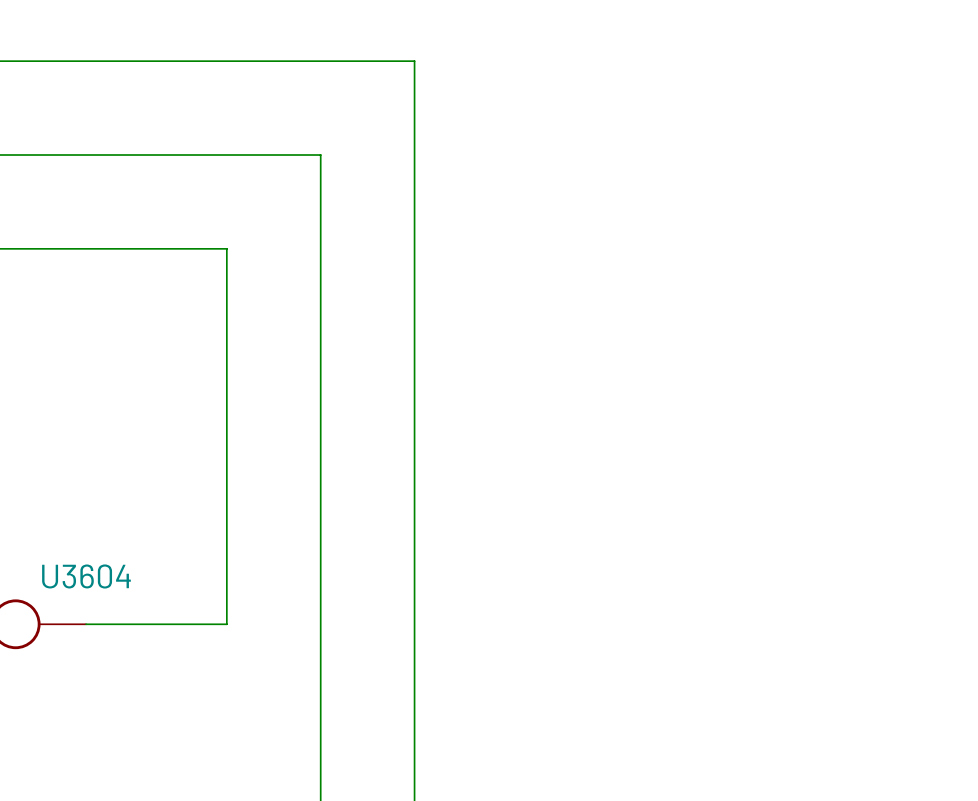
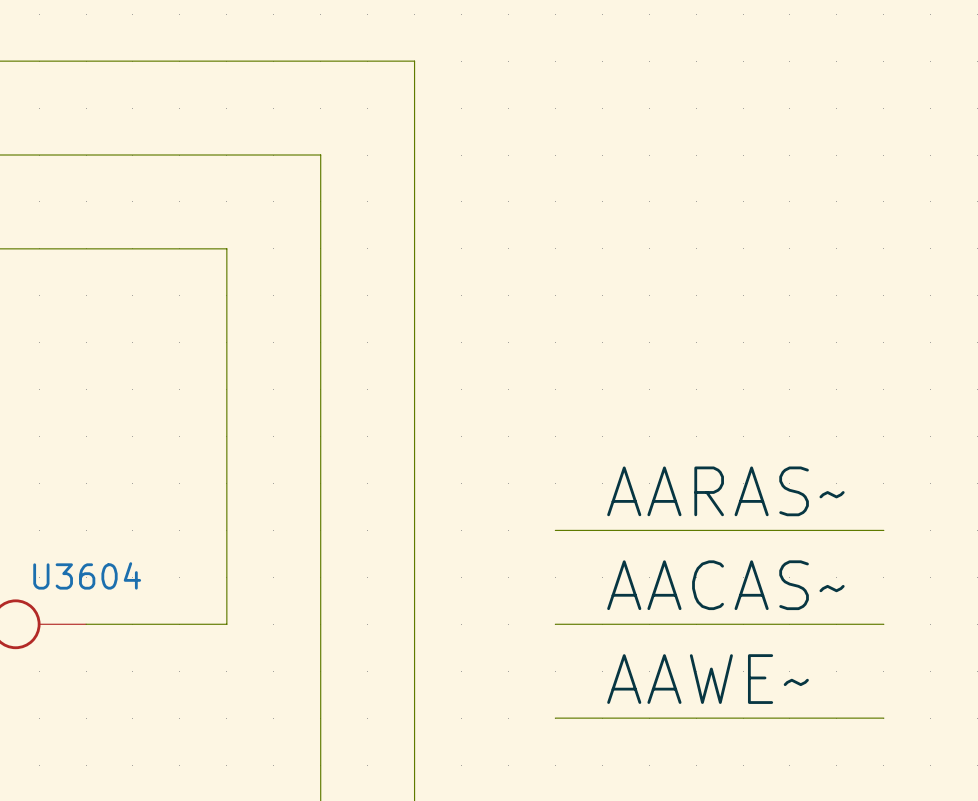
label: none -> AARAS~ (725, 491)
wire: none -> (555, 530) (883, 530)
label: none -> AACAS~ (725, 585)
wire: none -> (555, 624) (883, 624)
label: none -> AAWE~ (708, 679)
wire: none -> (555, 718) (883, 718)

